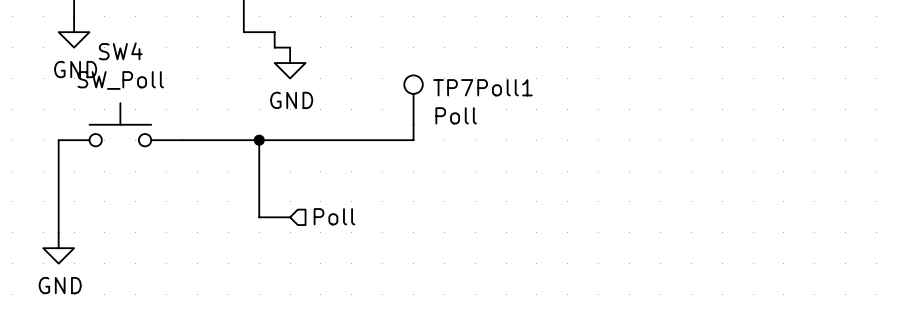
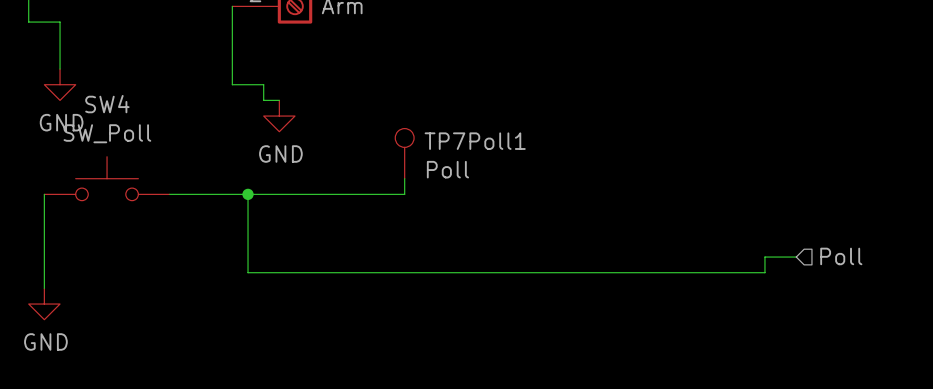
wire: none -> (796, 257) (764, 257) (764, 272) (279, 272)
hierarchical label: none -> Poll (841, 256)
hierarchical label: Poll (334, 216) -> none

